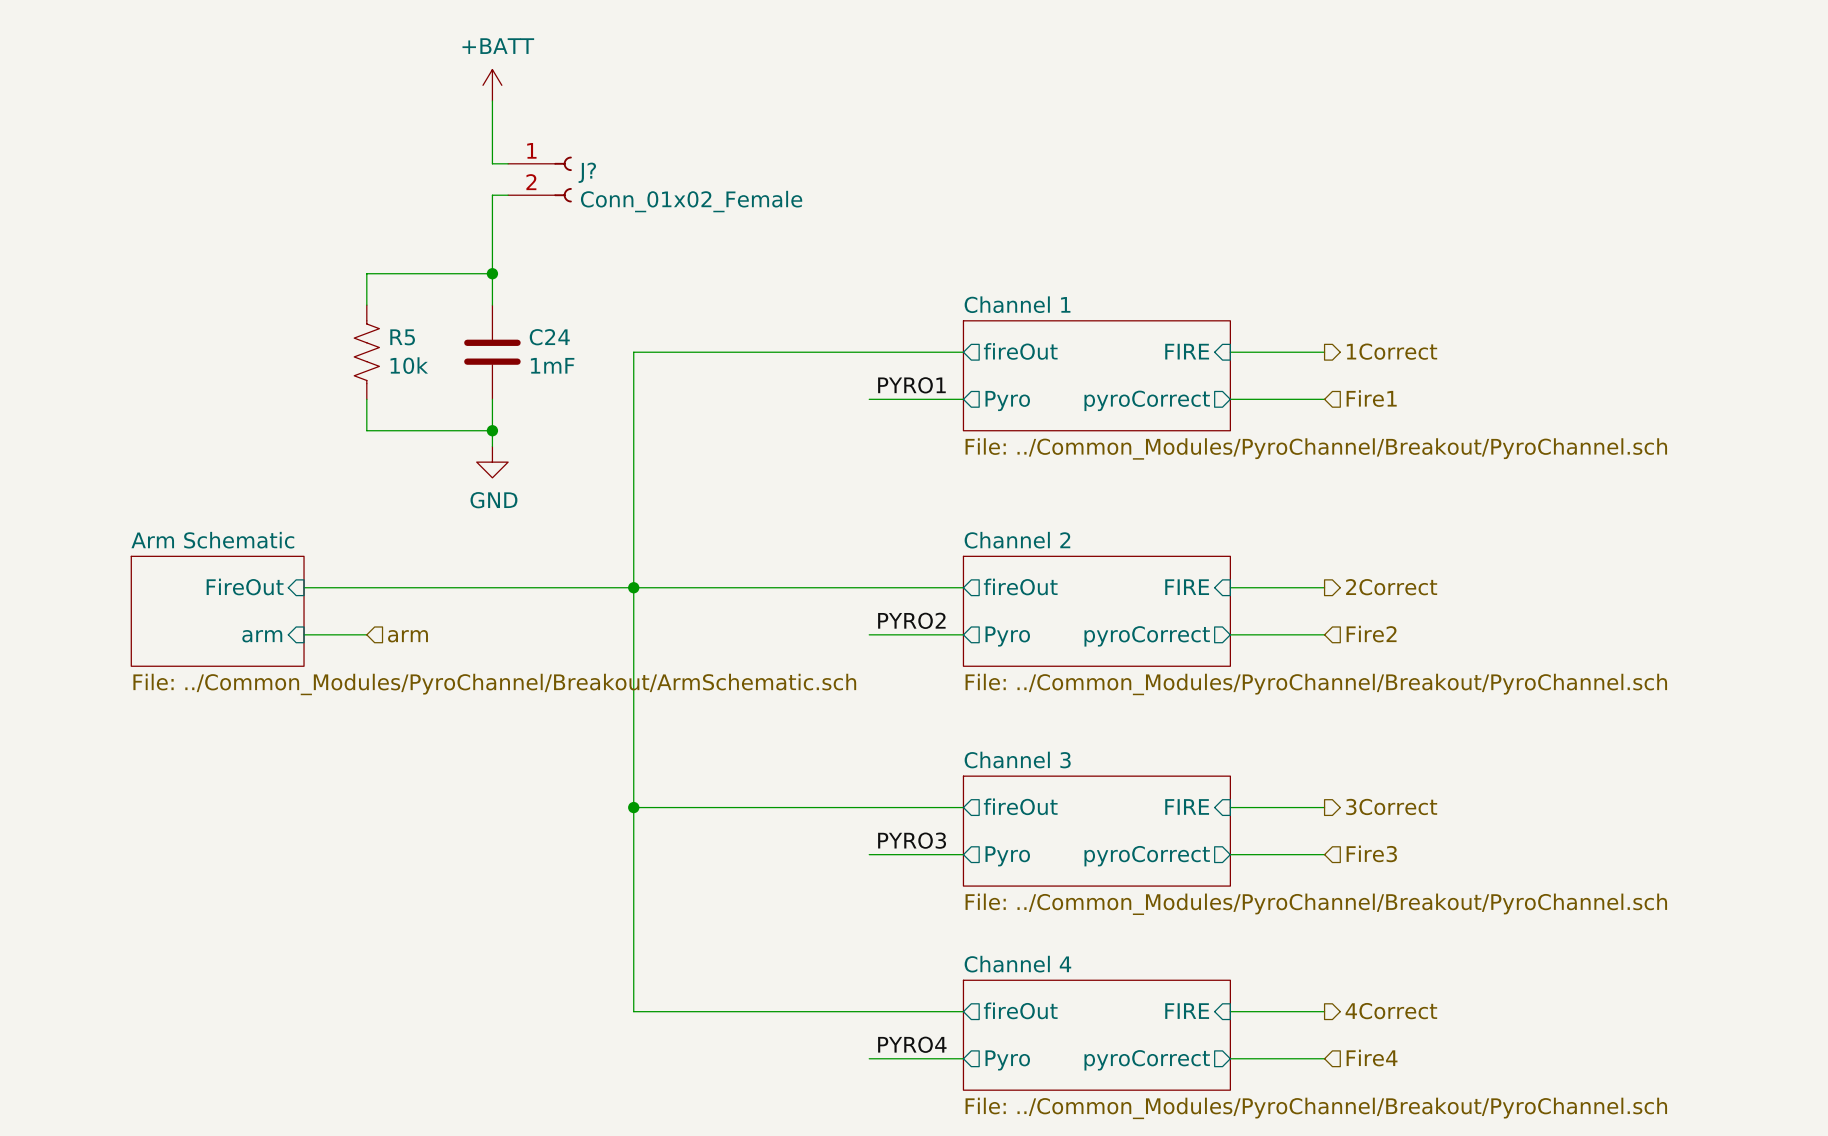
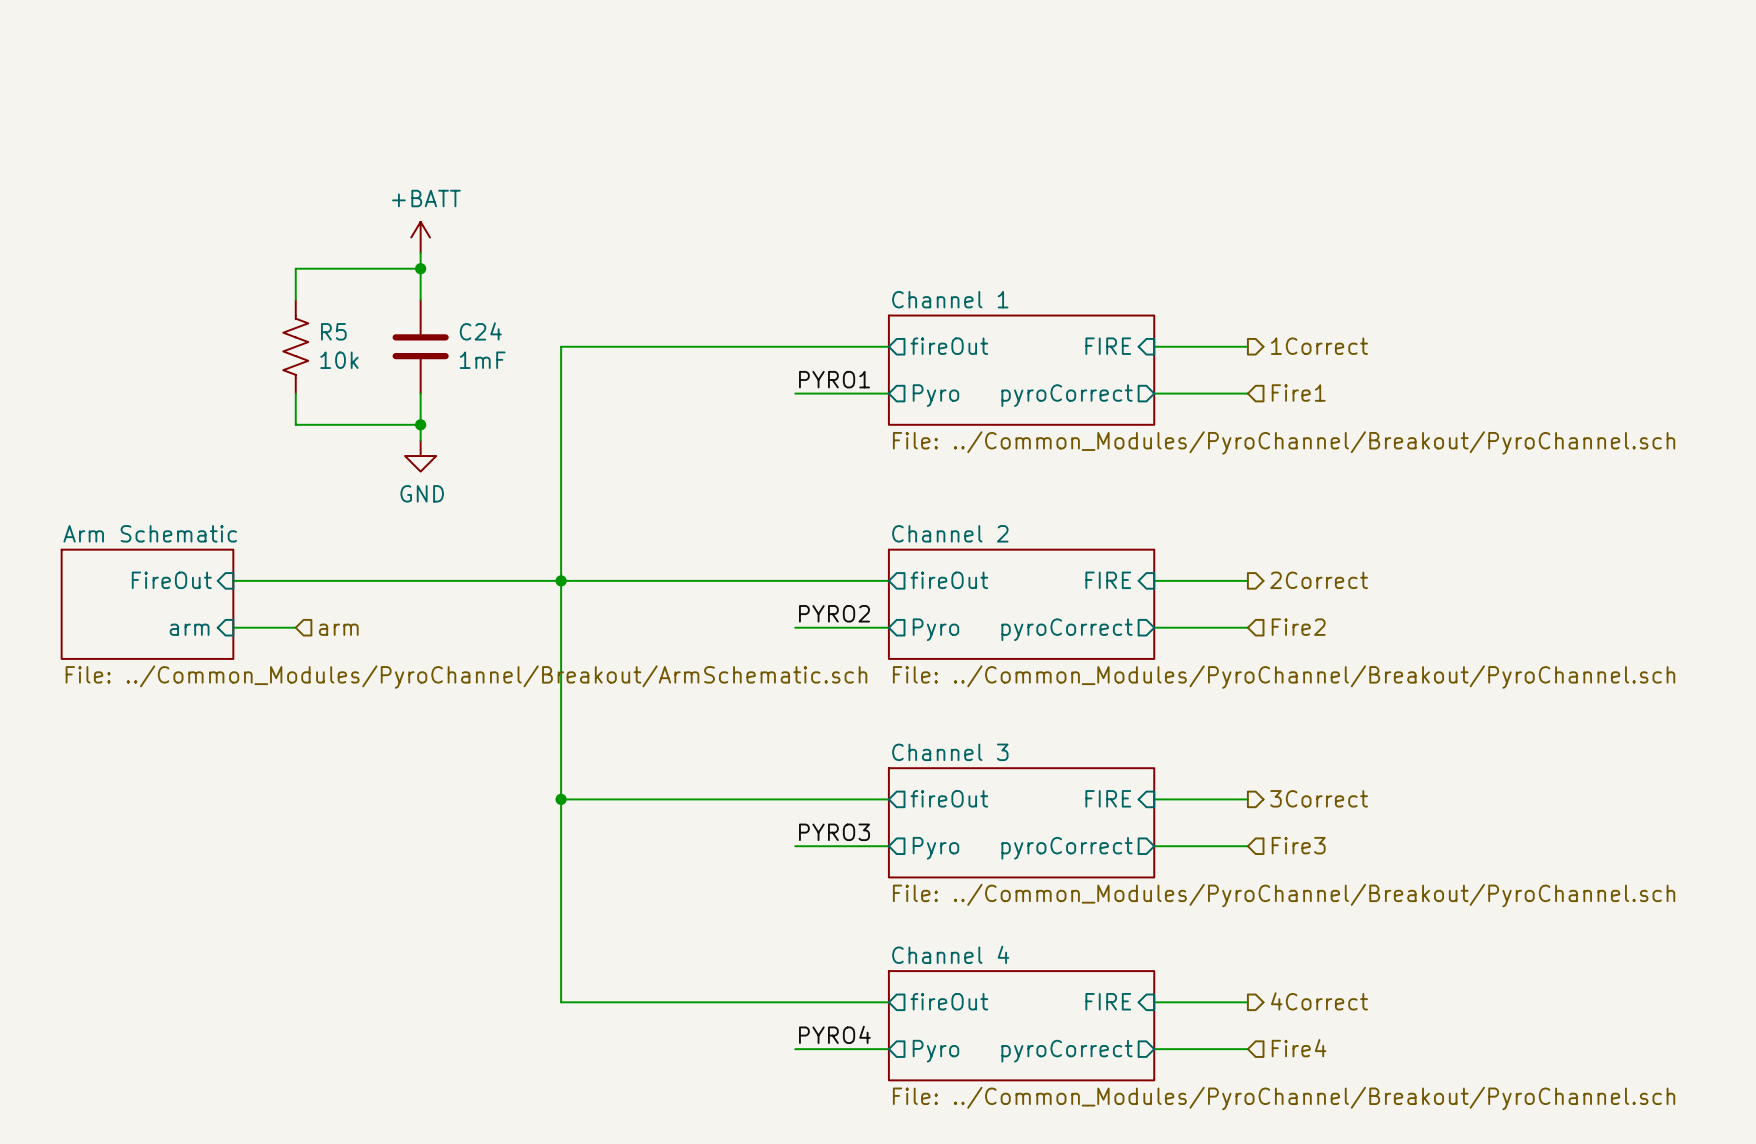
power symbol position: +BATT (492, 85) -> +BATT (420, 237)
wire: (492, 101) (492, 163) (508, 163) -> none
J?: Conn_01x02_Female (539, 179) -> none
wire: (508, 195) (492, 195) (492, 258) -> none

